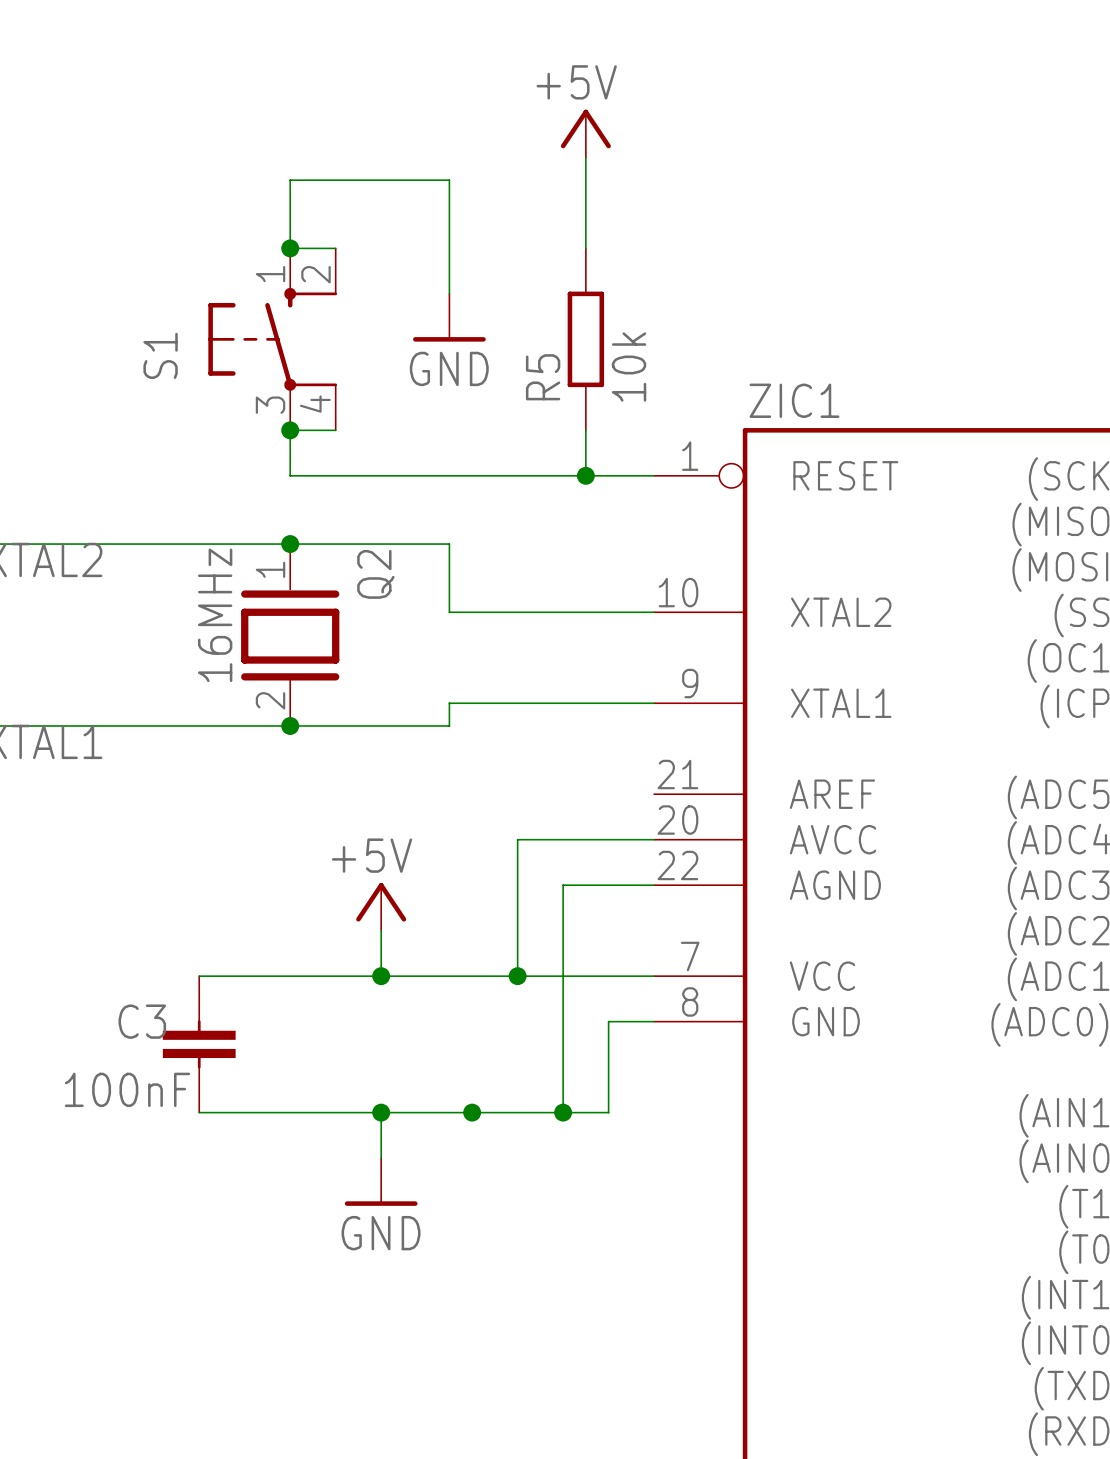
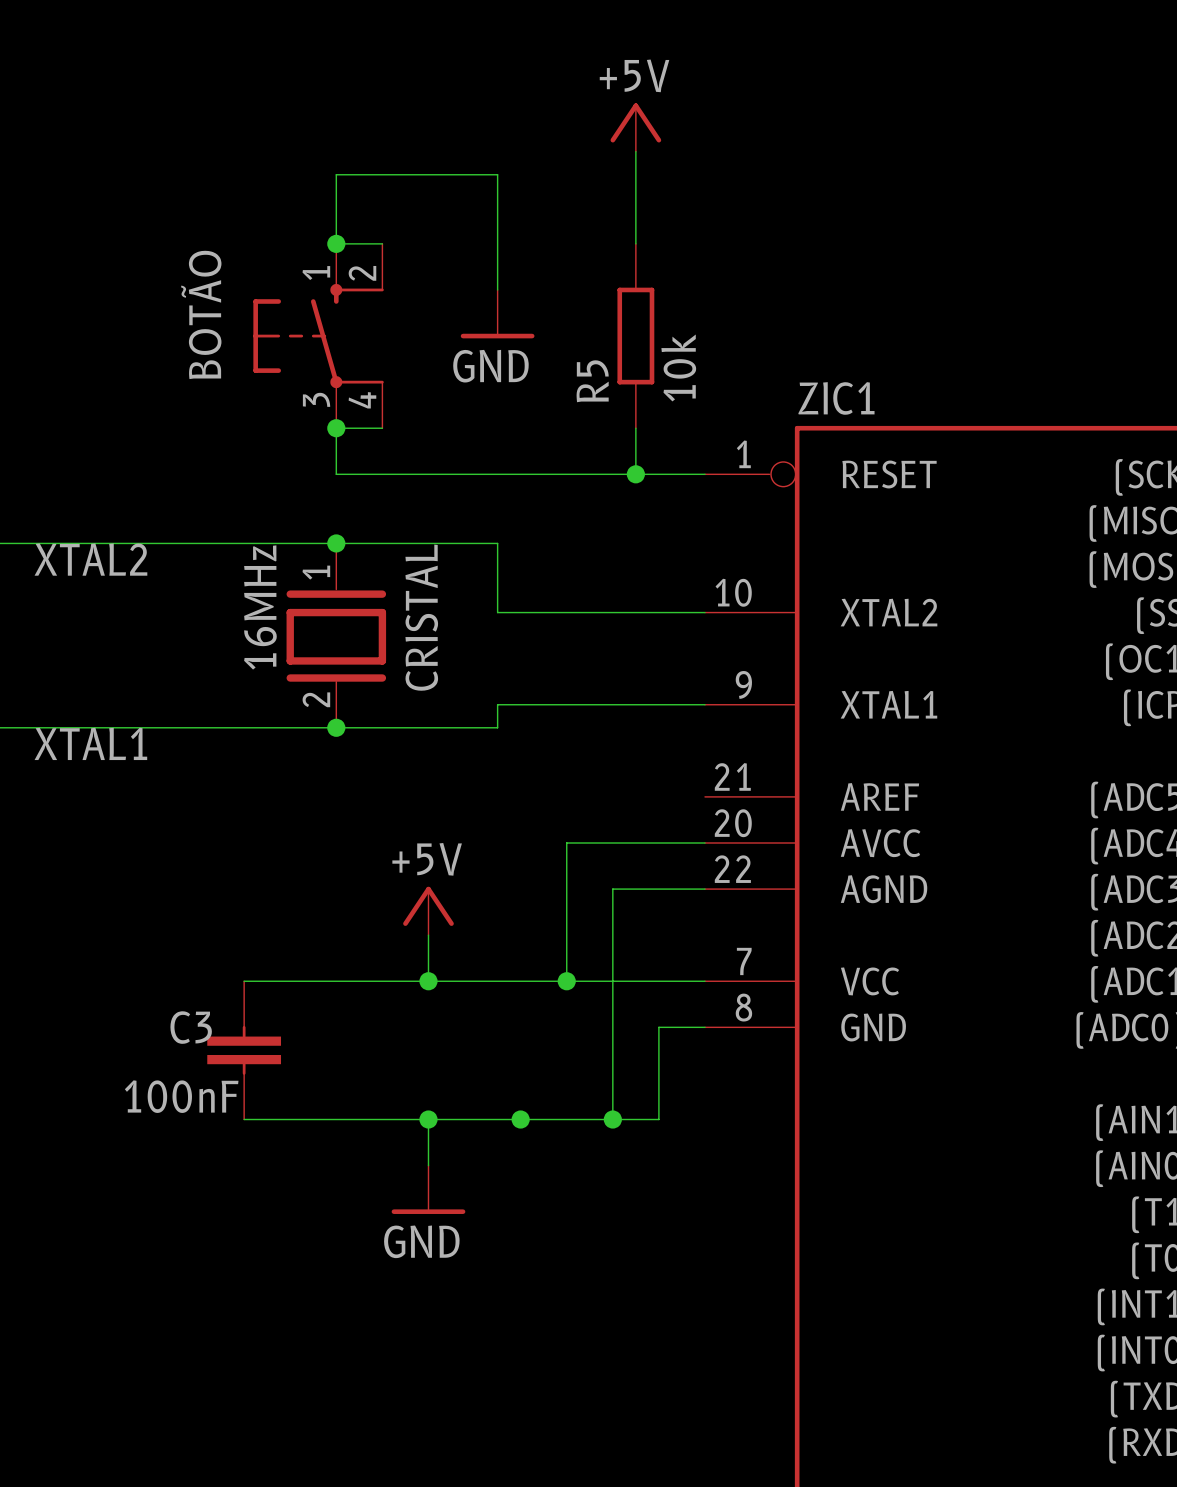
S1 name: S1 (160, 355) -> BOTÃO (201, 314)
Q2 name: Q2 (375, 574) -> CRISTAL (421, 617)

